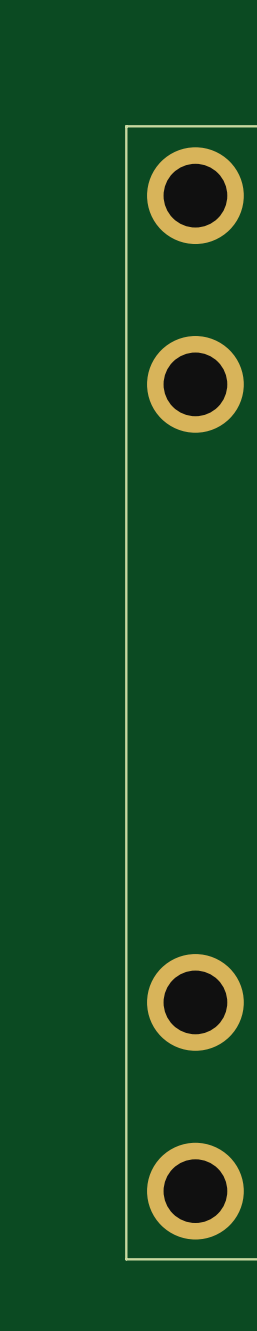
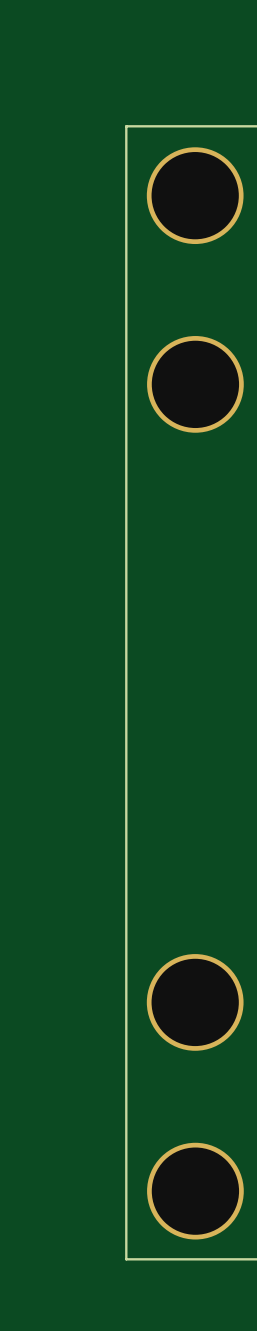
part footprint: [147, 147, 244, 245] -> [146, 147, 244, 245]
part footprint: [147, 336, 244, 433] -> [147, 336, 244, 433]
part footprint: [147, 954, 244, 1051] -> [146, 954, 244, 1051]
part footprint: [147, 1142, 244, 1240] -> [147, 1142, 244, 1240]

